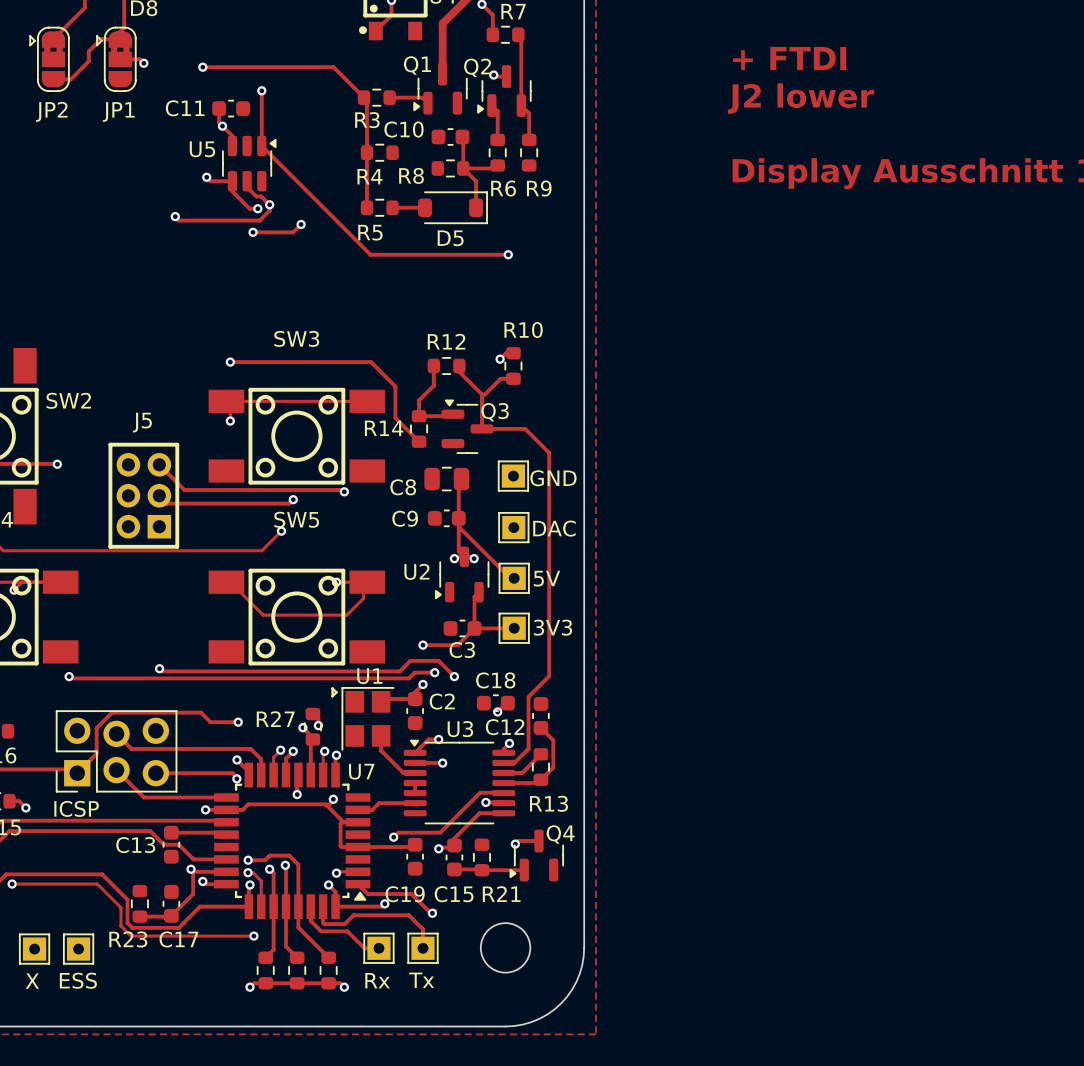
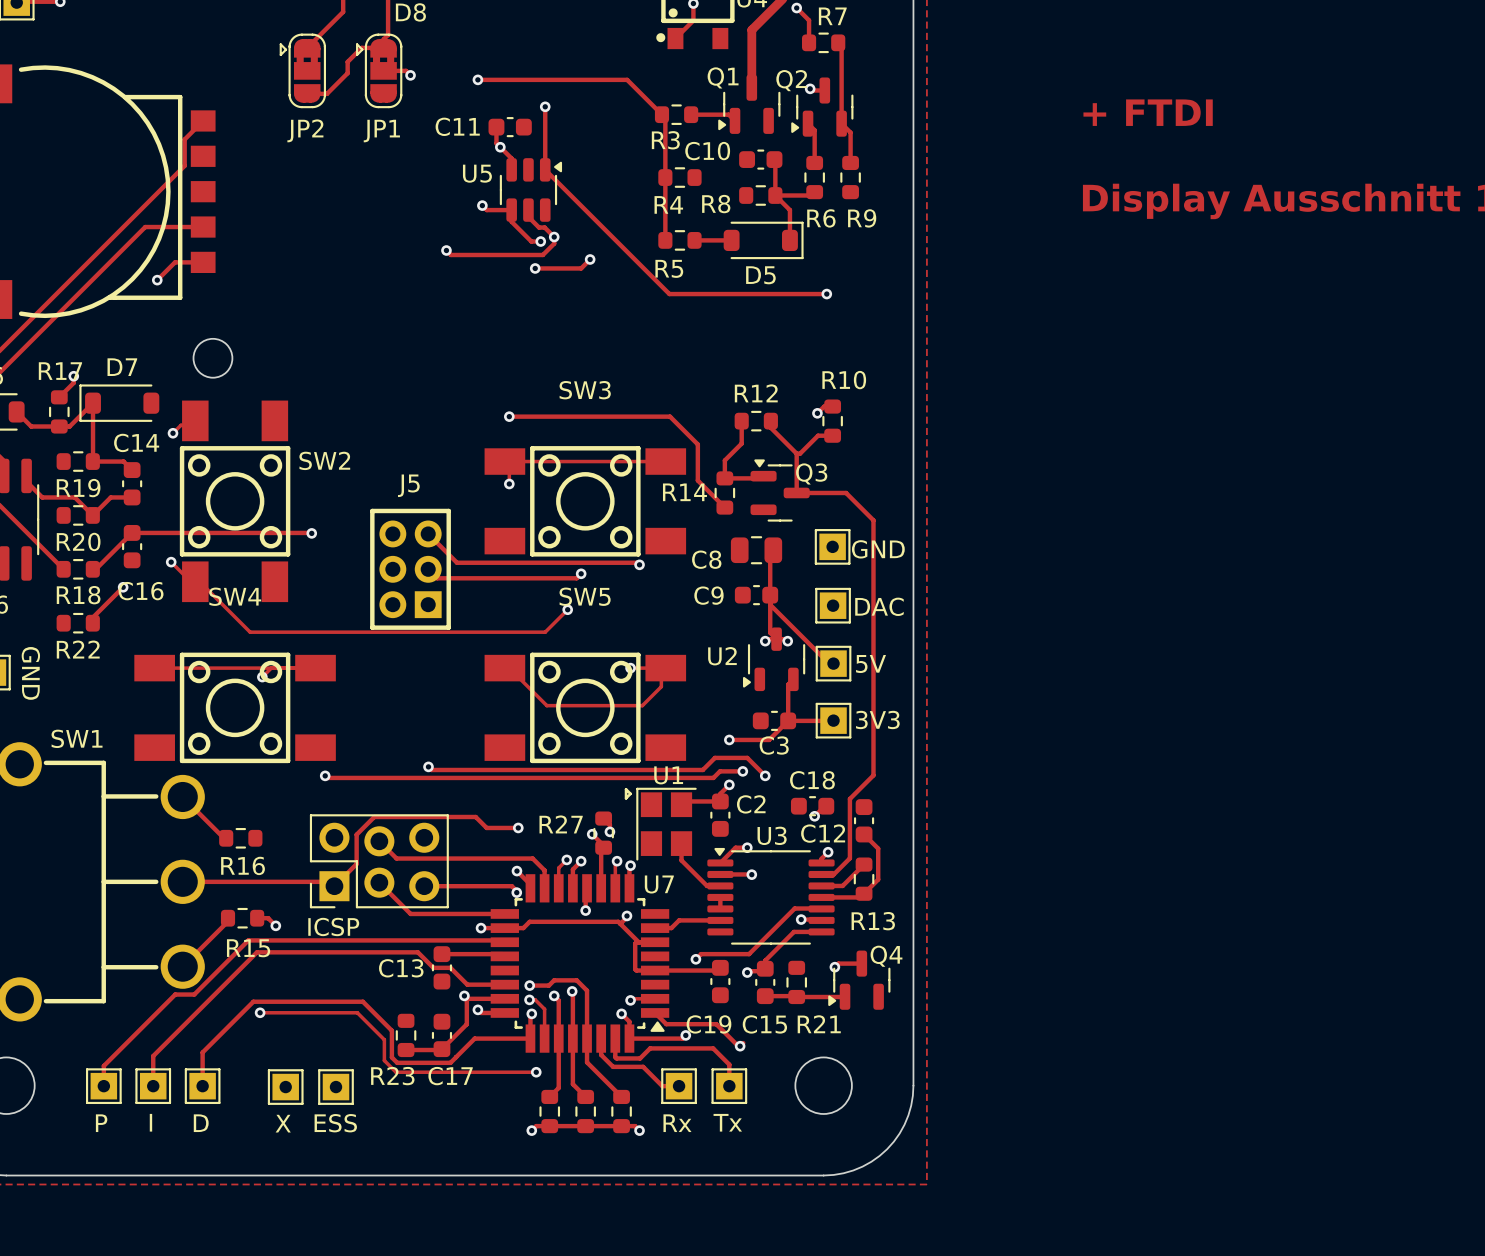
text: + FTDI (789, 58) -> none
text: J2 lower (801, 98) -> + FTDI (1148, 112)

